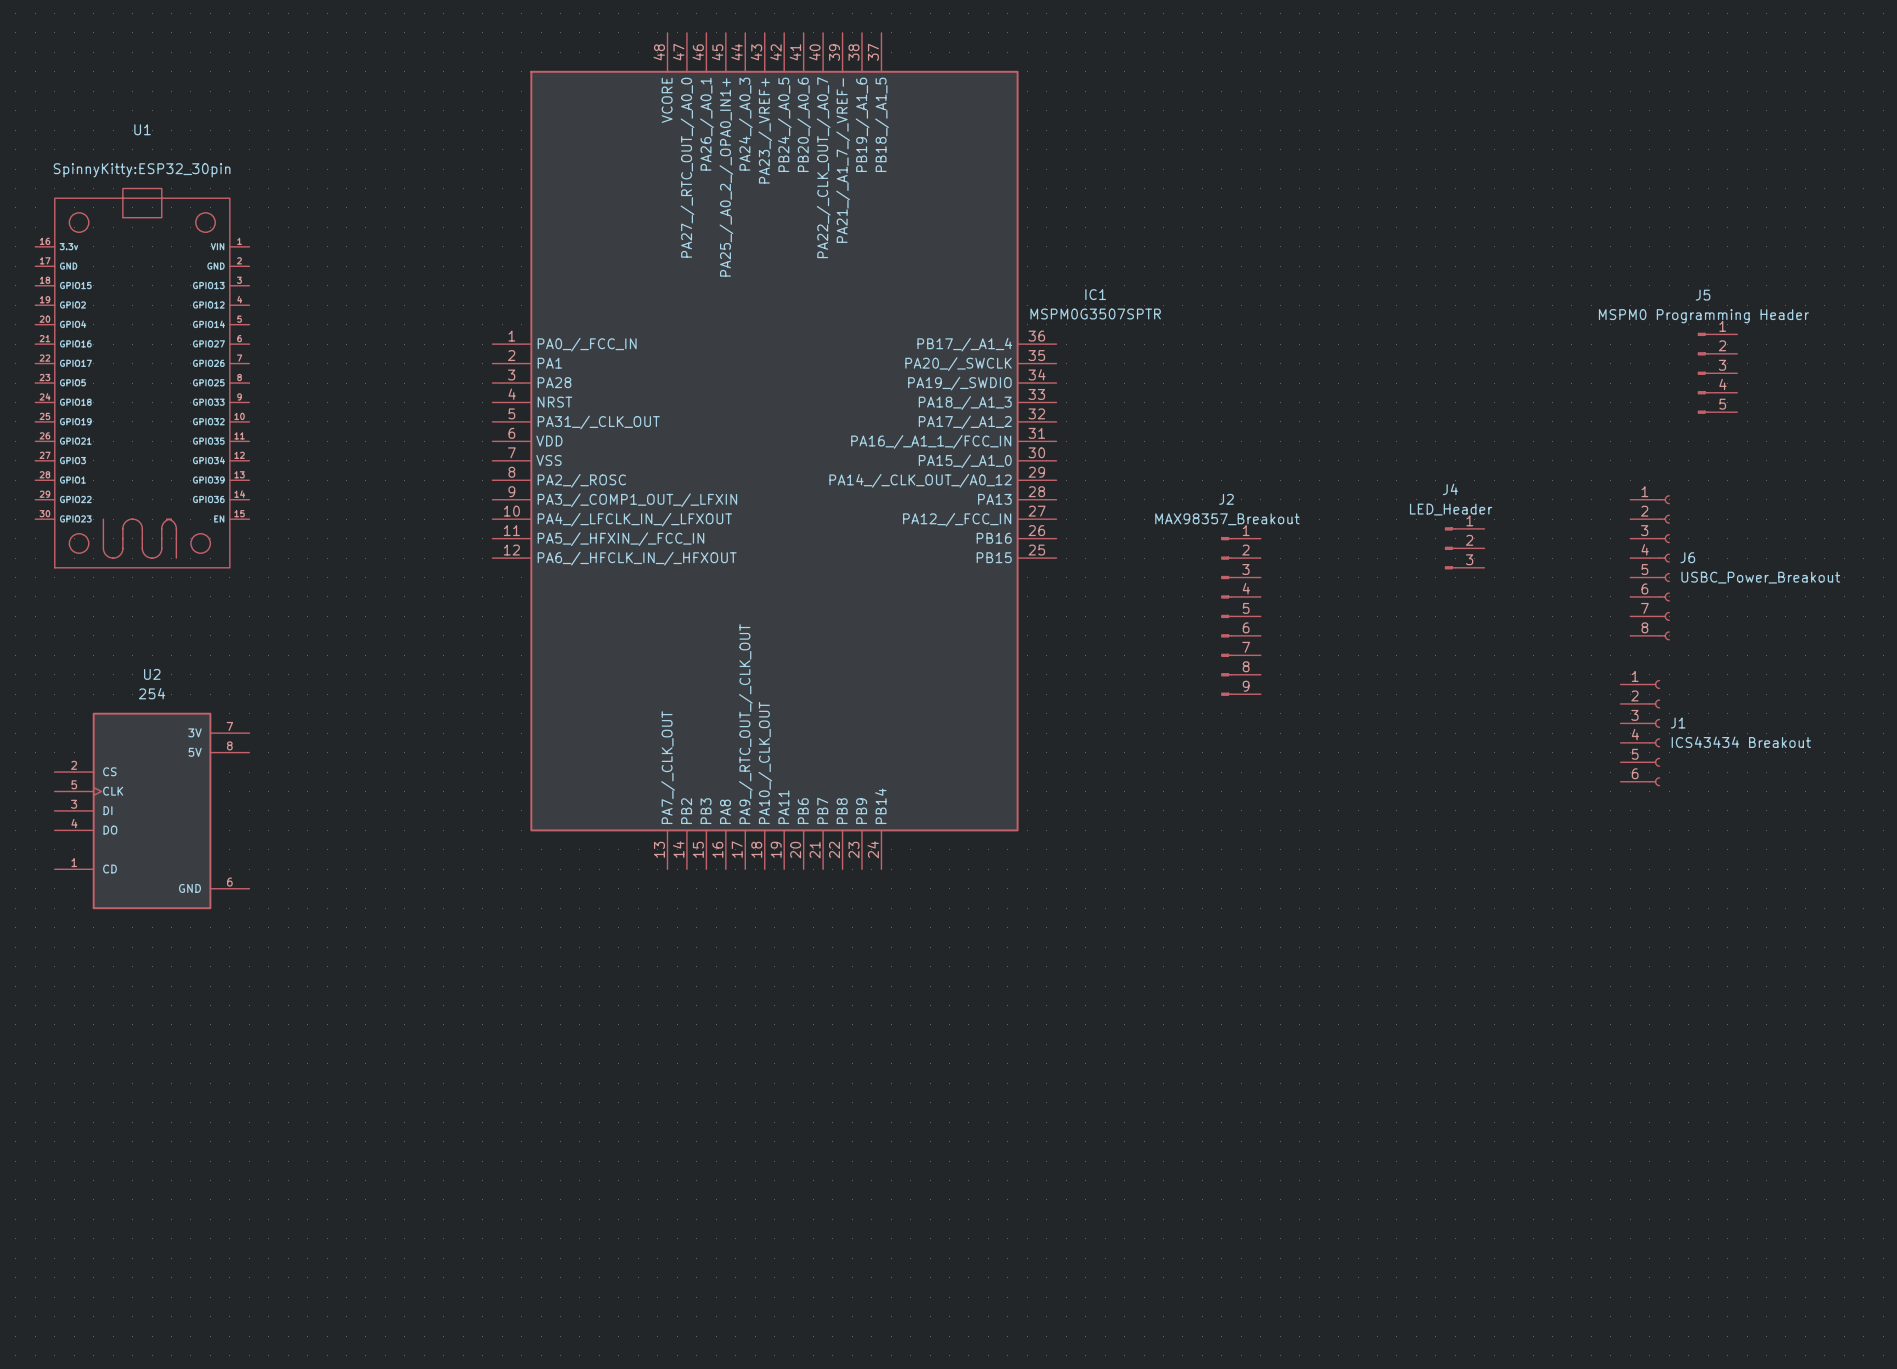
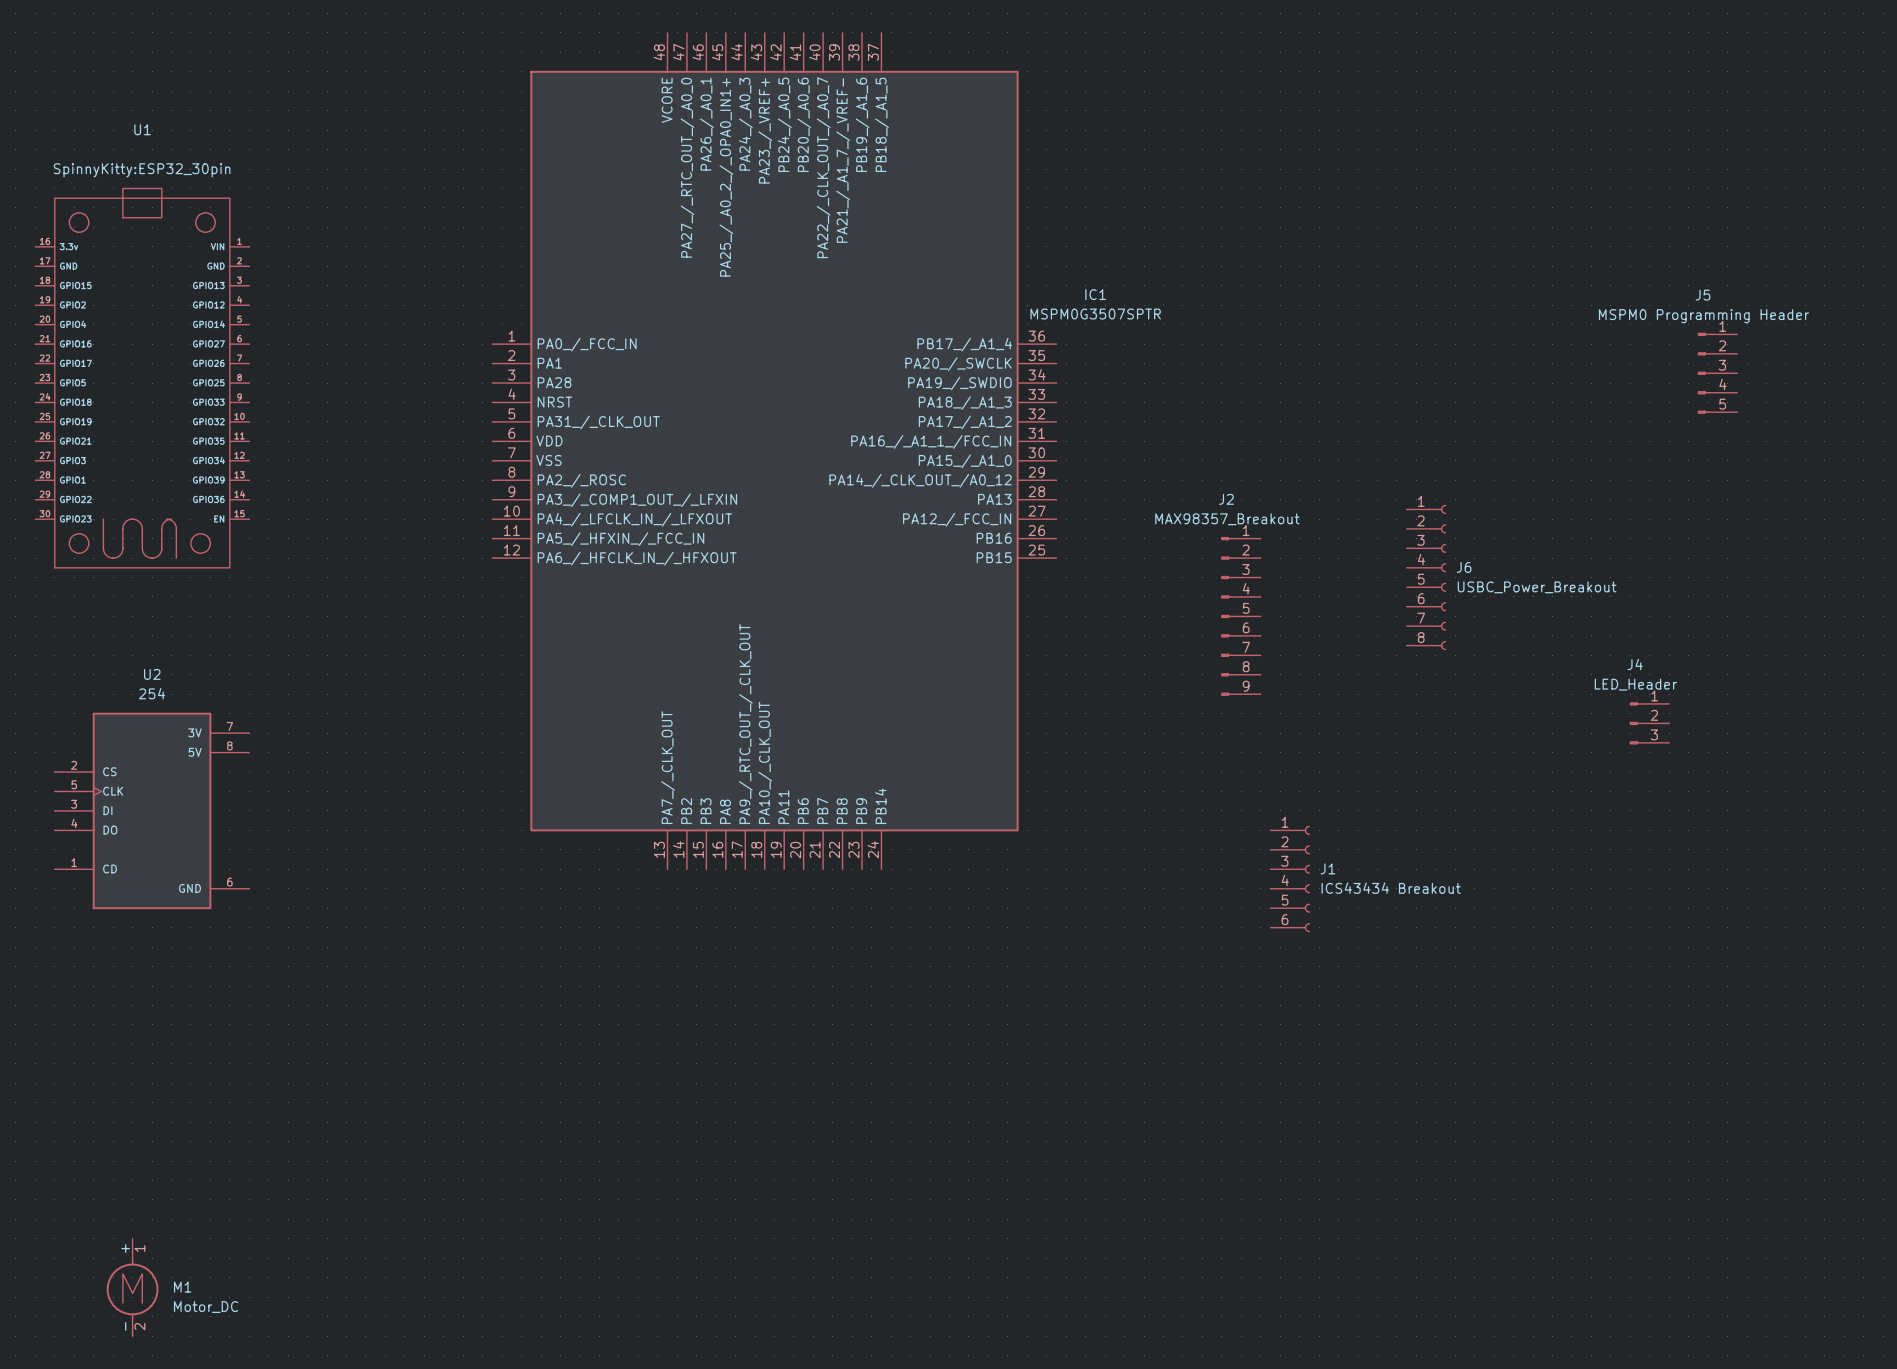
J4 position: (1464, 548) -> (1649, 723)
J6 position: (1650, 567) -> (1426, 577)
J1 position: (1640, 733) -> (1290, 879)
M1: none -> Motor_DC (132, 1287)

